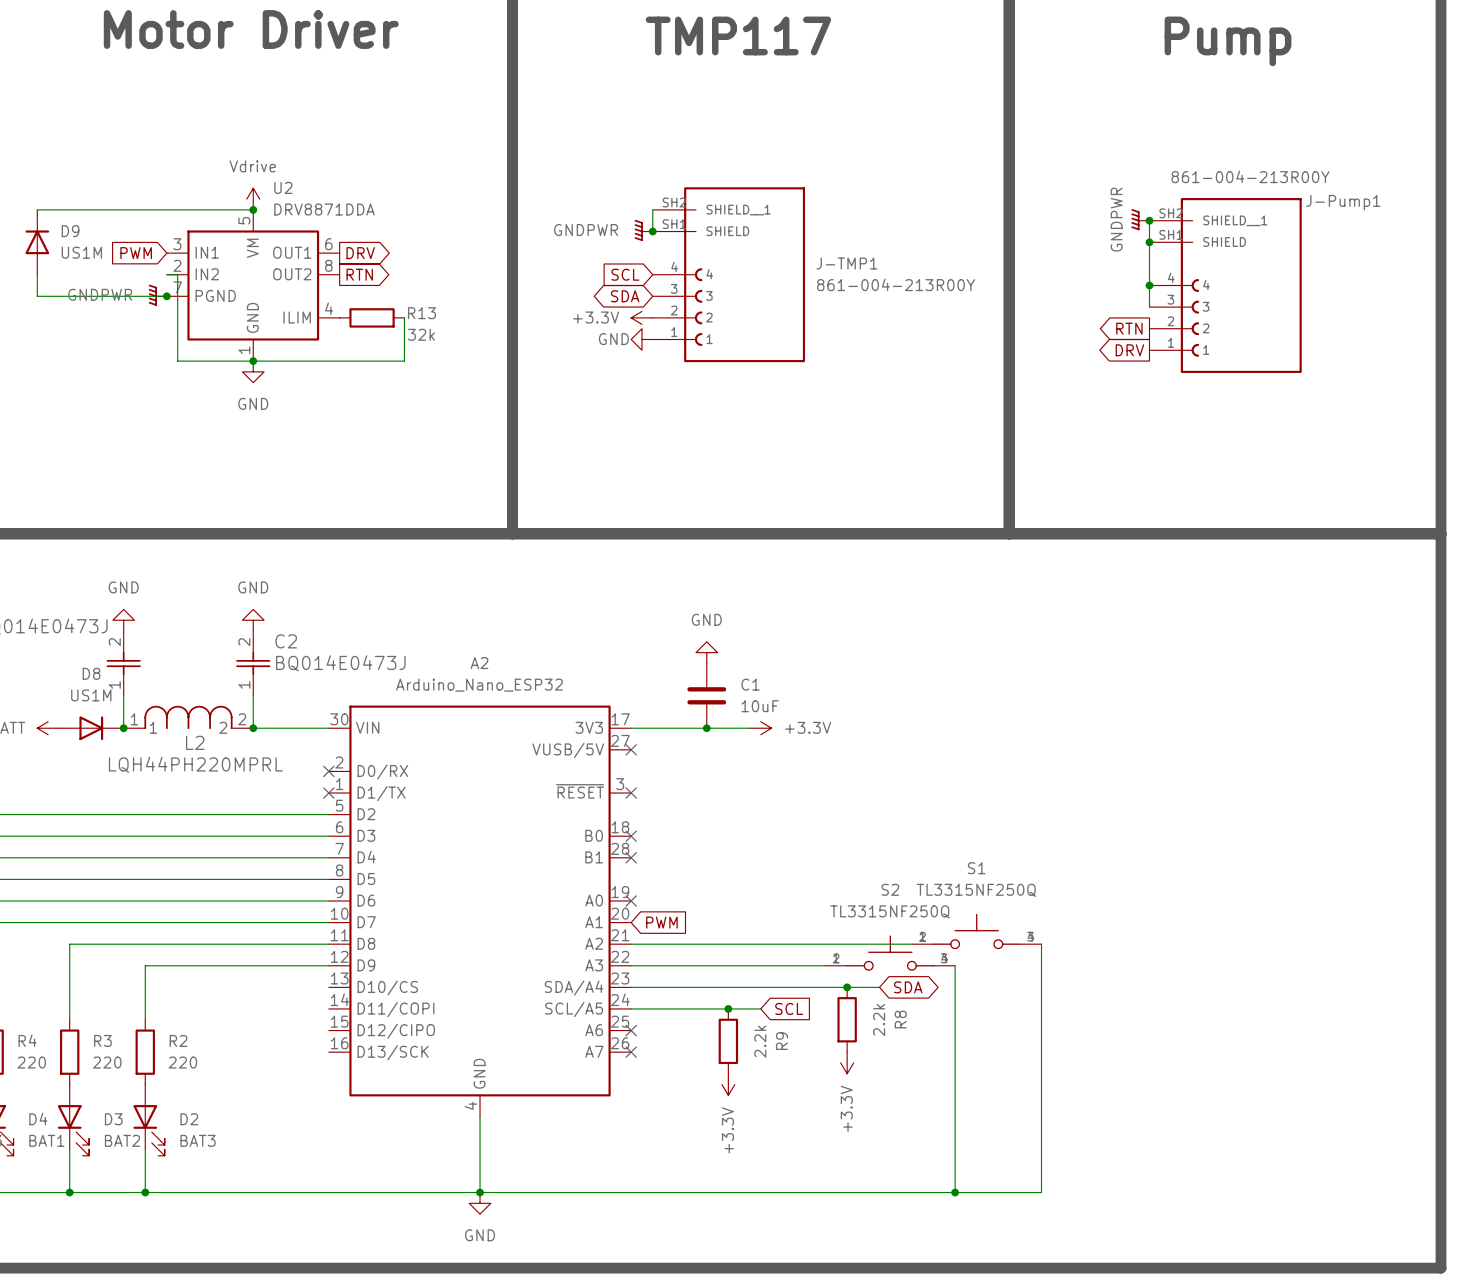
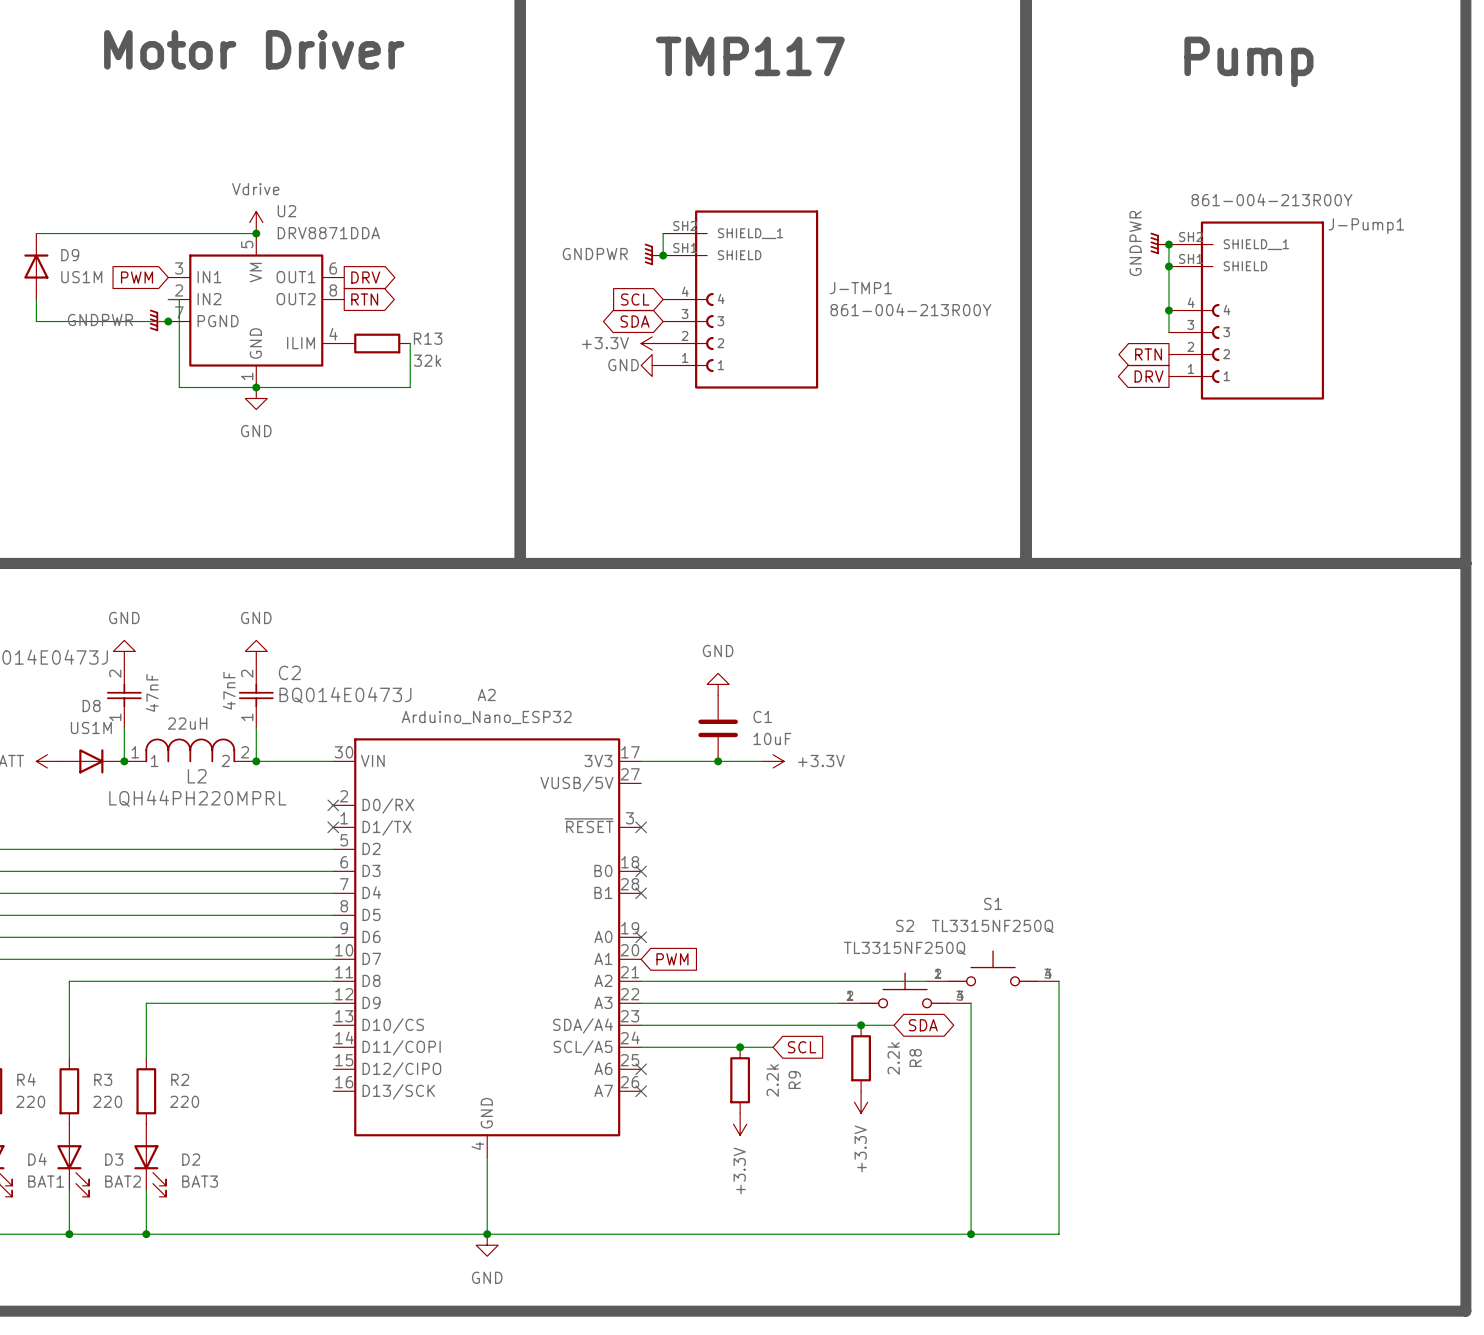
C2 text: none -> 47nF (229, 690)
part text: none -> 47nF (152, 692)
L2 text: none -> 22uH (187, 723)
no-connect mark: (631, 749) -> none

